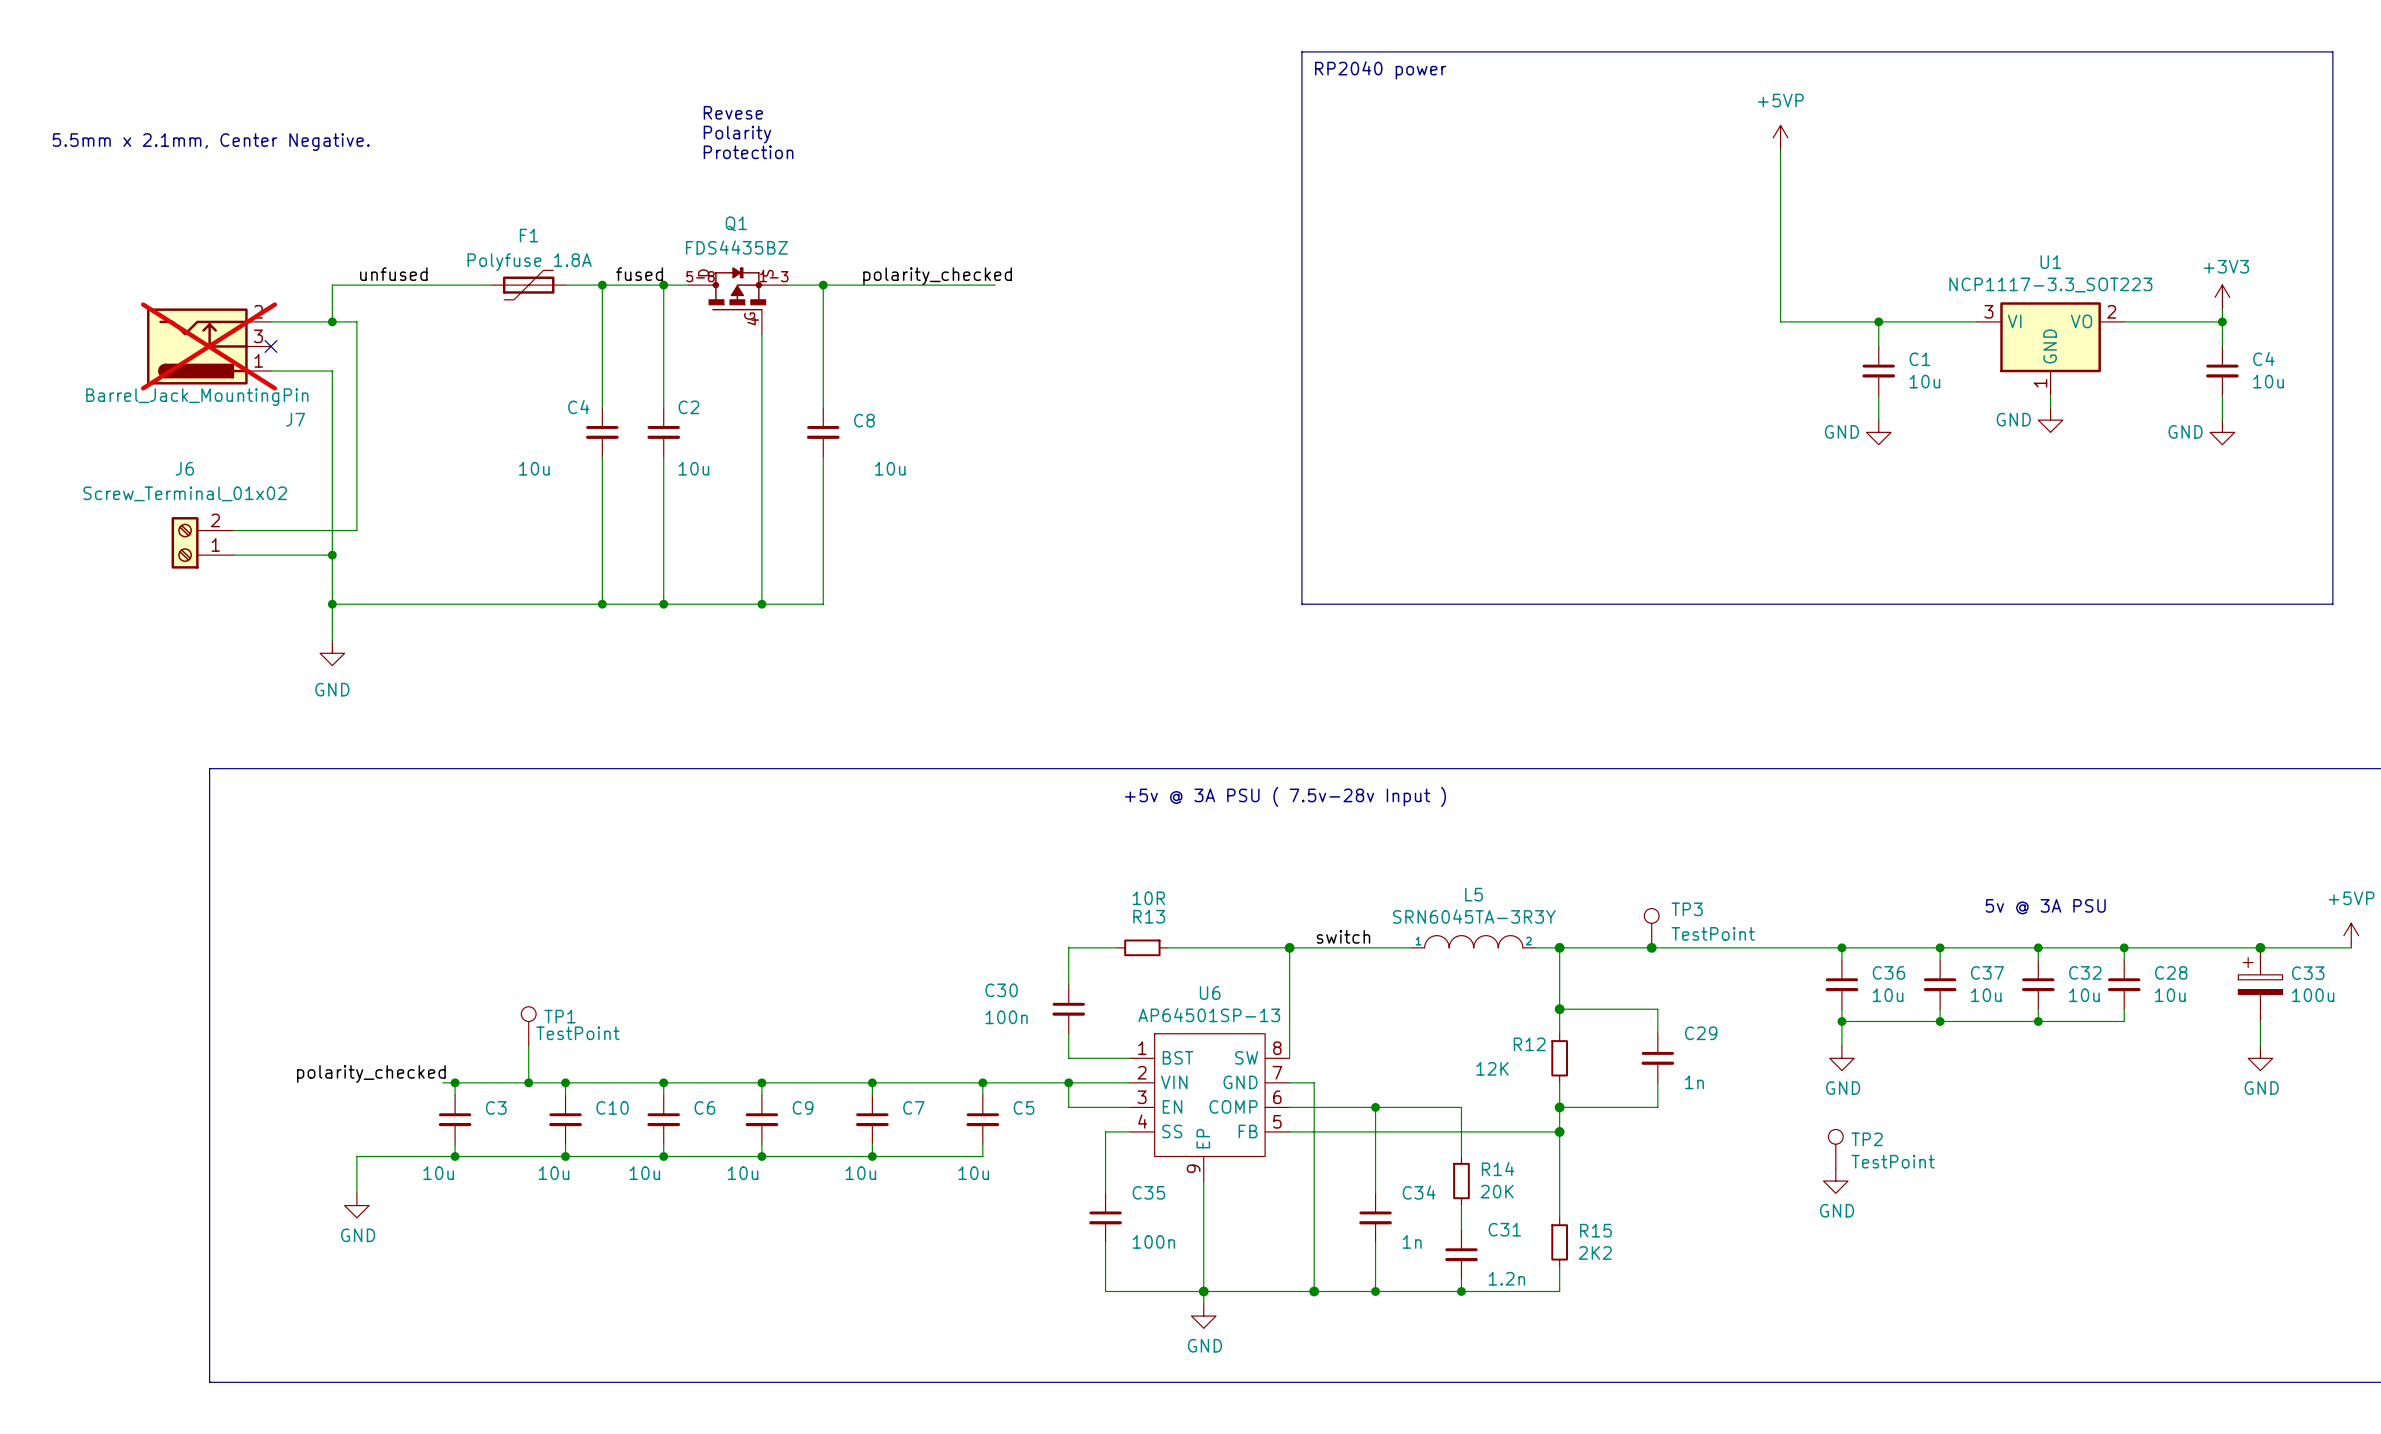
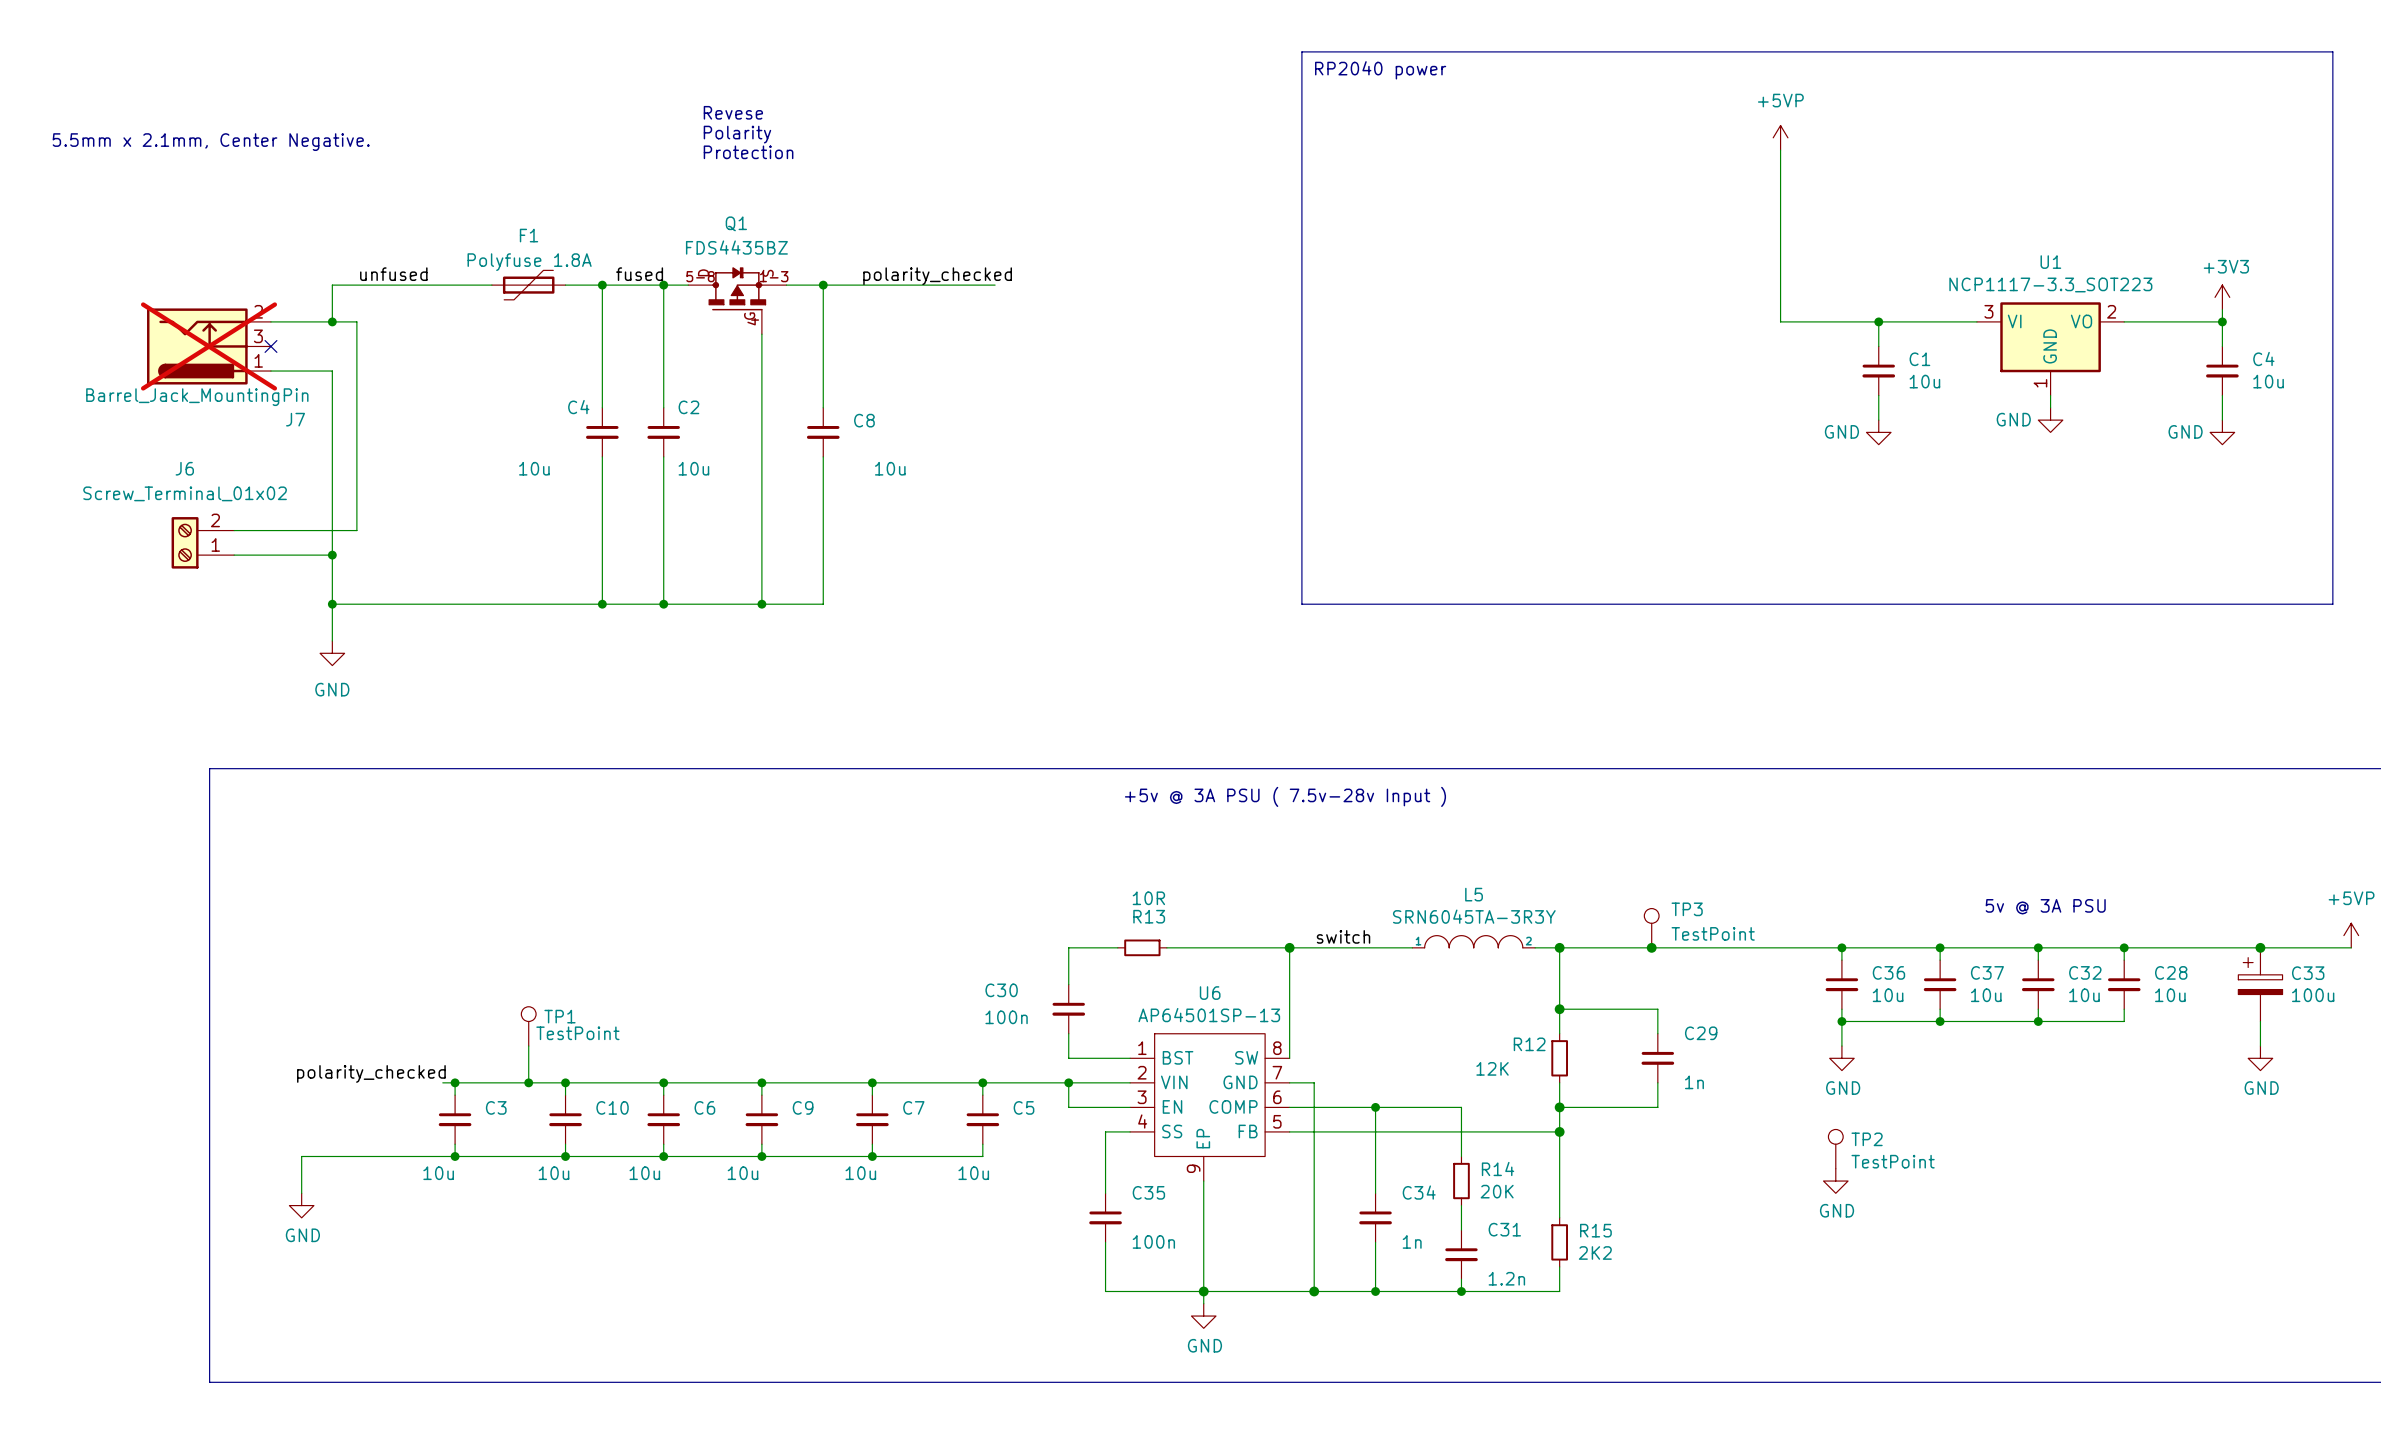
wire: (356, 1156) (356, 1193) -> (356, 1156) (301, 1156) (301, 1193)
power symbol position: GND (356, 1205) -> GND (301, 1205)

